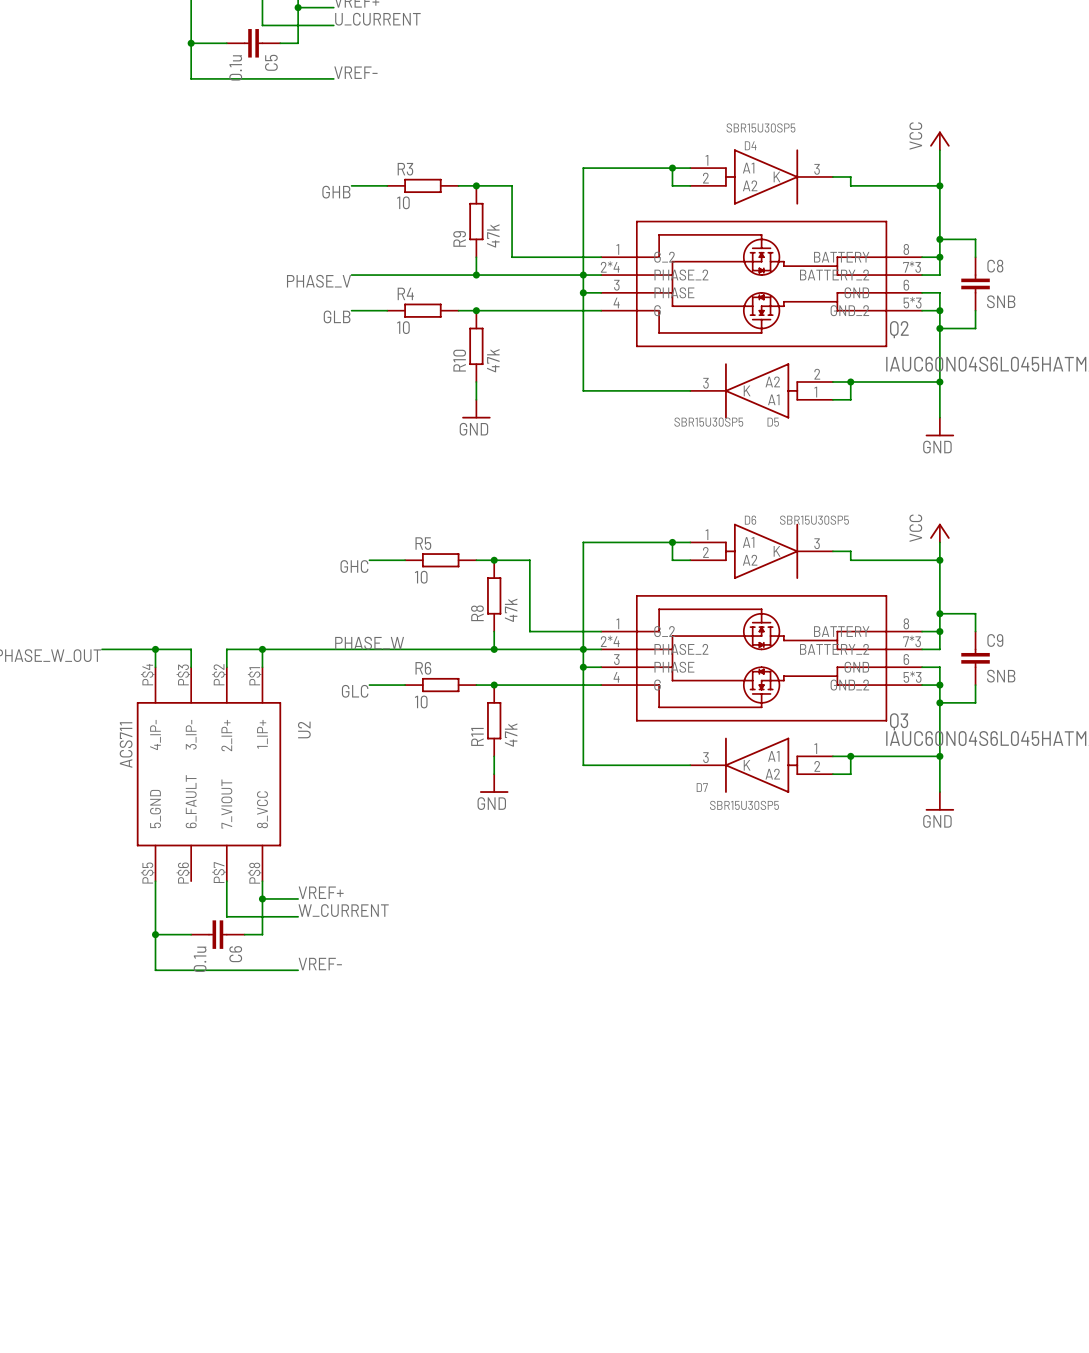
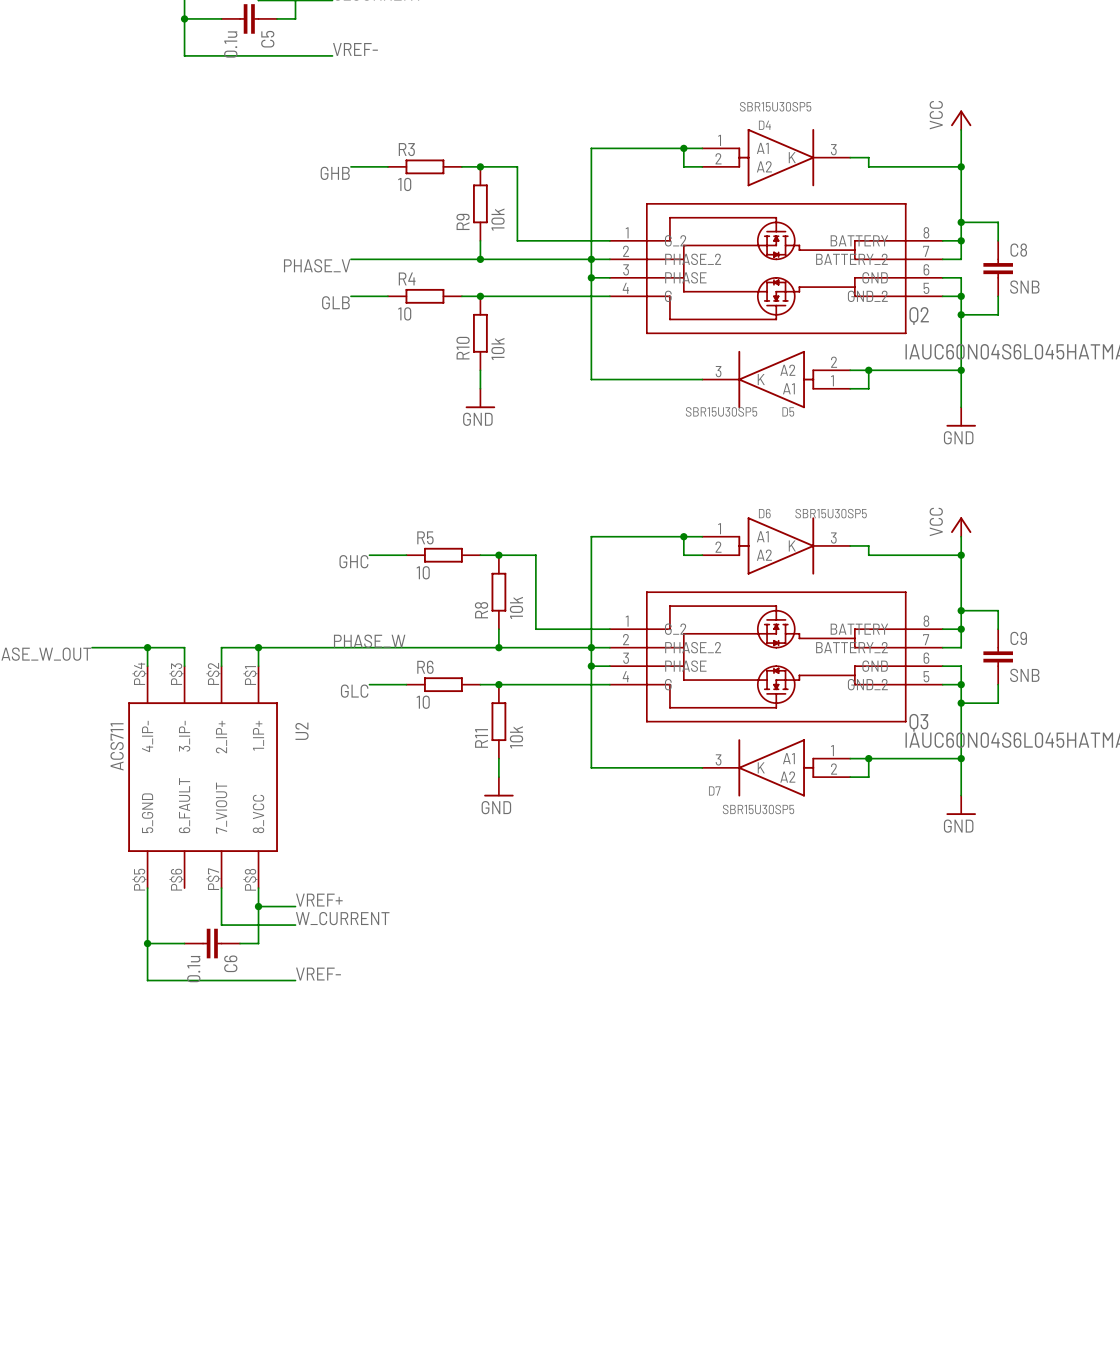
R9 value: 47k (493, 235) -> 10k (497, 219)
Q2 pin number: 2*4 (610, 266) -> 2 (626, 251)
Q2 pin number: 7*3 (912, 267) -> 7 (926, 251)
Q2 pin number: 5*3 (912, 302) -> 5 (926, 288)
R10 value: 47k (493, 360) -> 10k (497, 349)
R8 value: 47k (511, 610) -> 10k (516, 607)
Q3 pin number: 2*4 (610, 641) -> 2 (626, 639)
Q3 pin number: 7*3 (912, 641) -> 7 (926, 639)
Q3 pin number: 5*3 (912, 677) -> 5 (926, 676)
R11 value: 47k (511, 735) -> 10k (516, 737)

